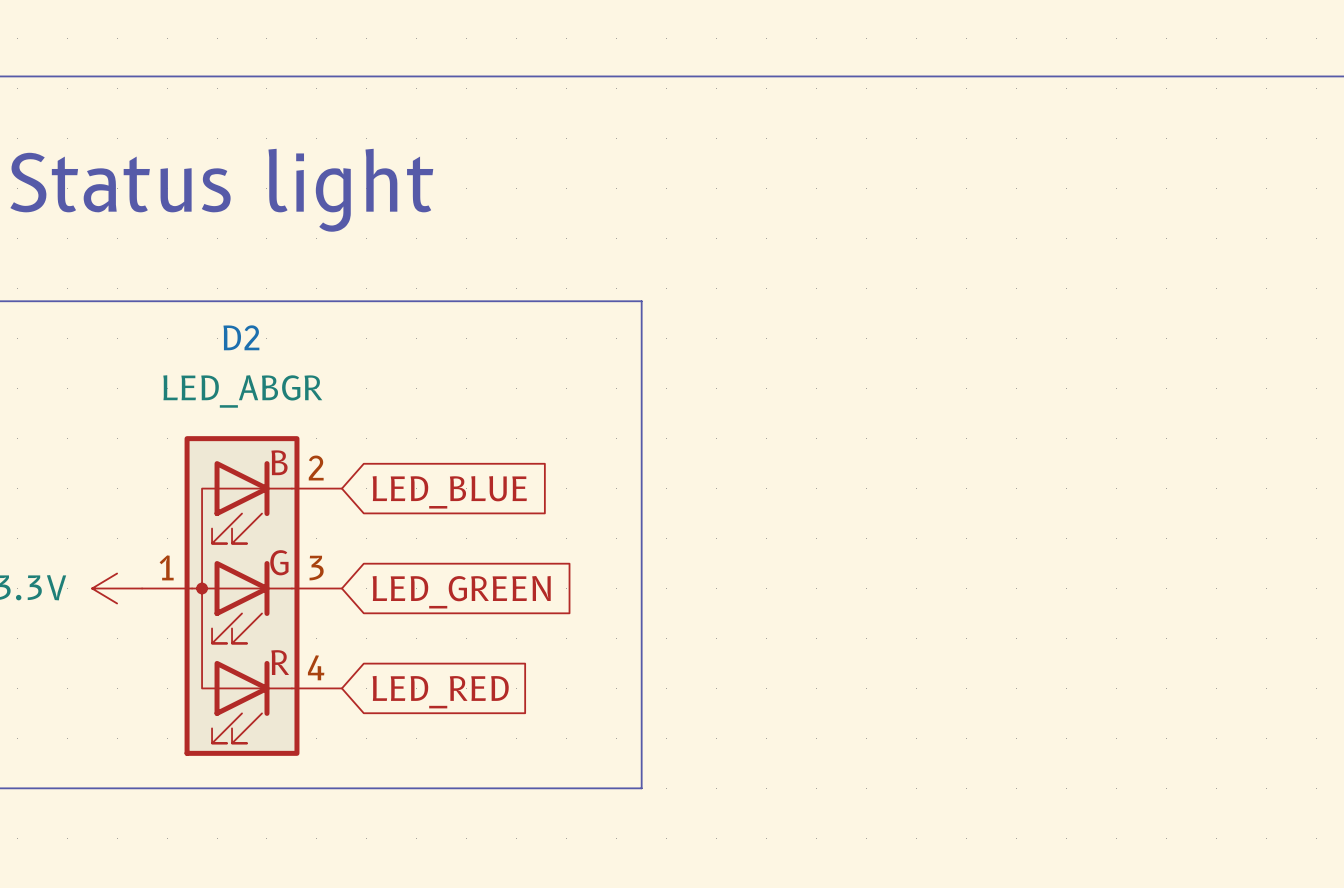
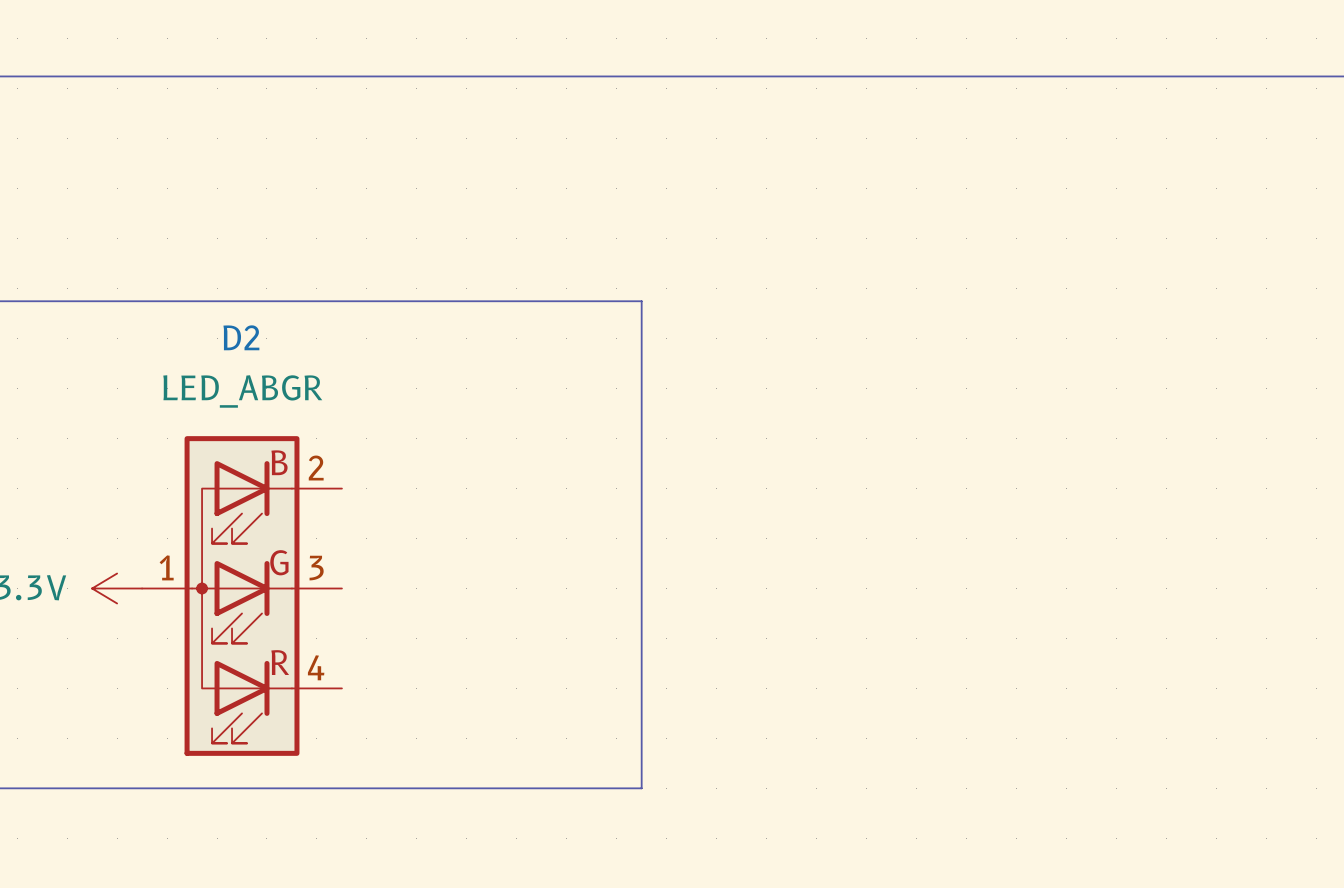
text: Status light (221, 190) -> none
global label: LED_BLUE (449, 492) -> none
global label: LED_GREEN (461, 592) -> none
global label: LED_RED (440, 692) -> none

